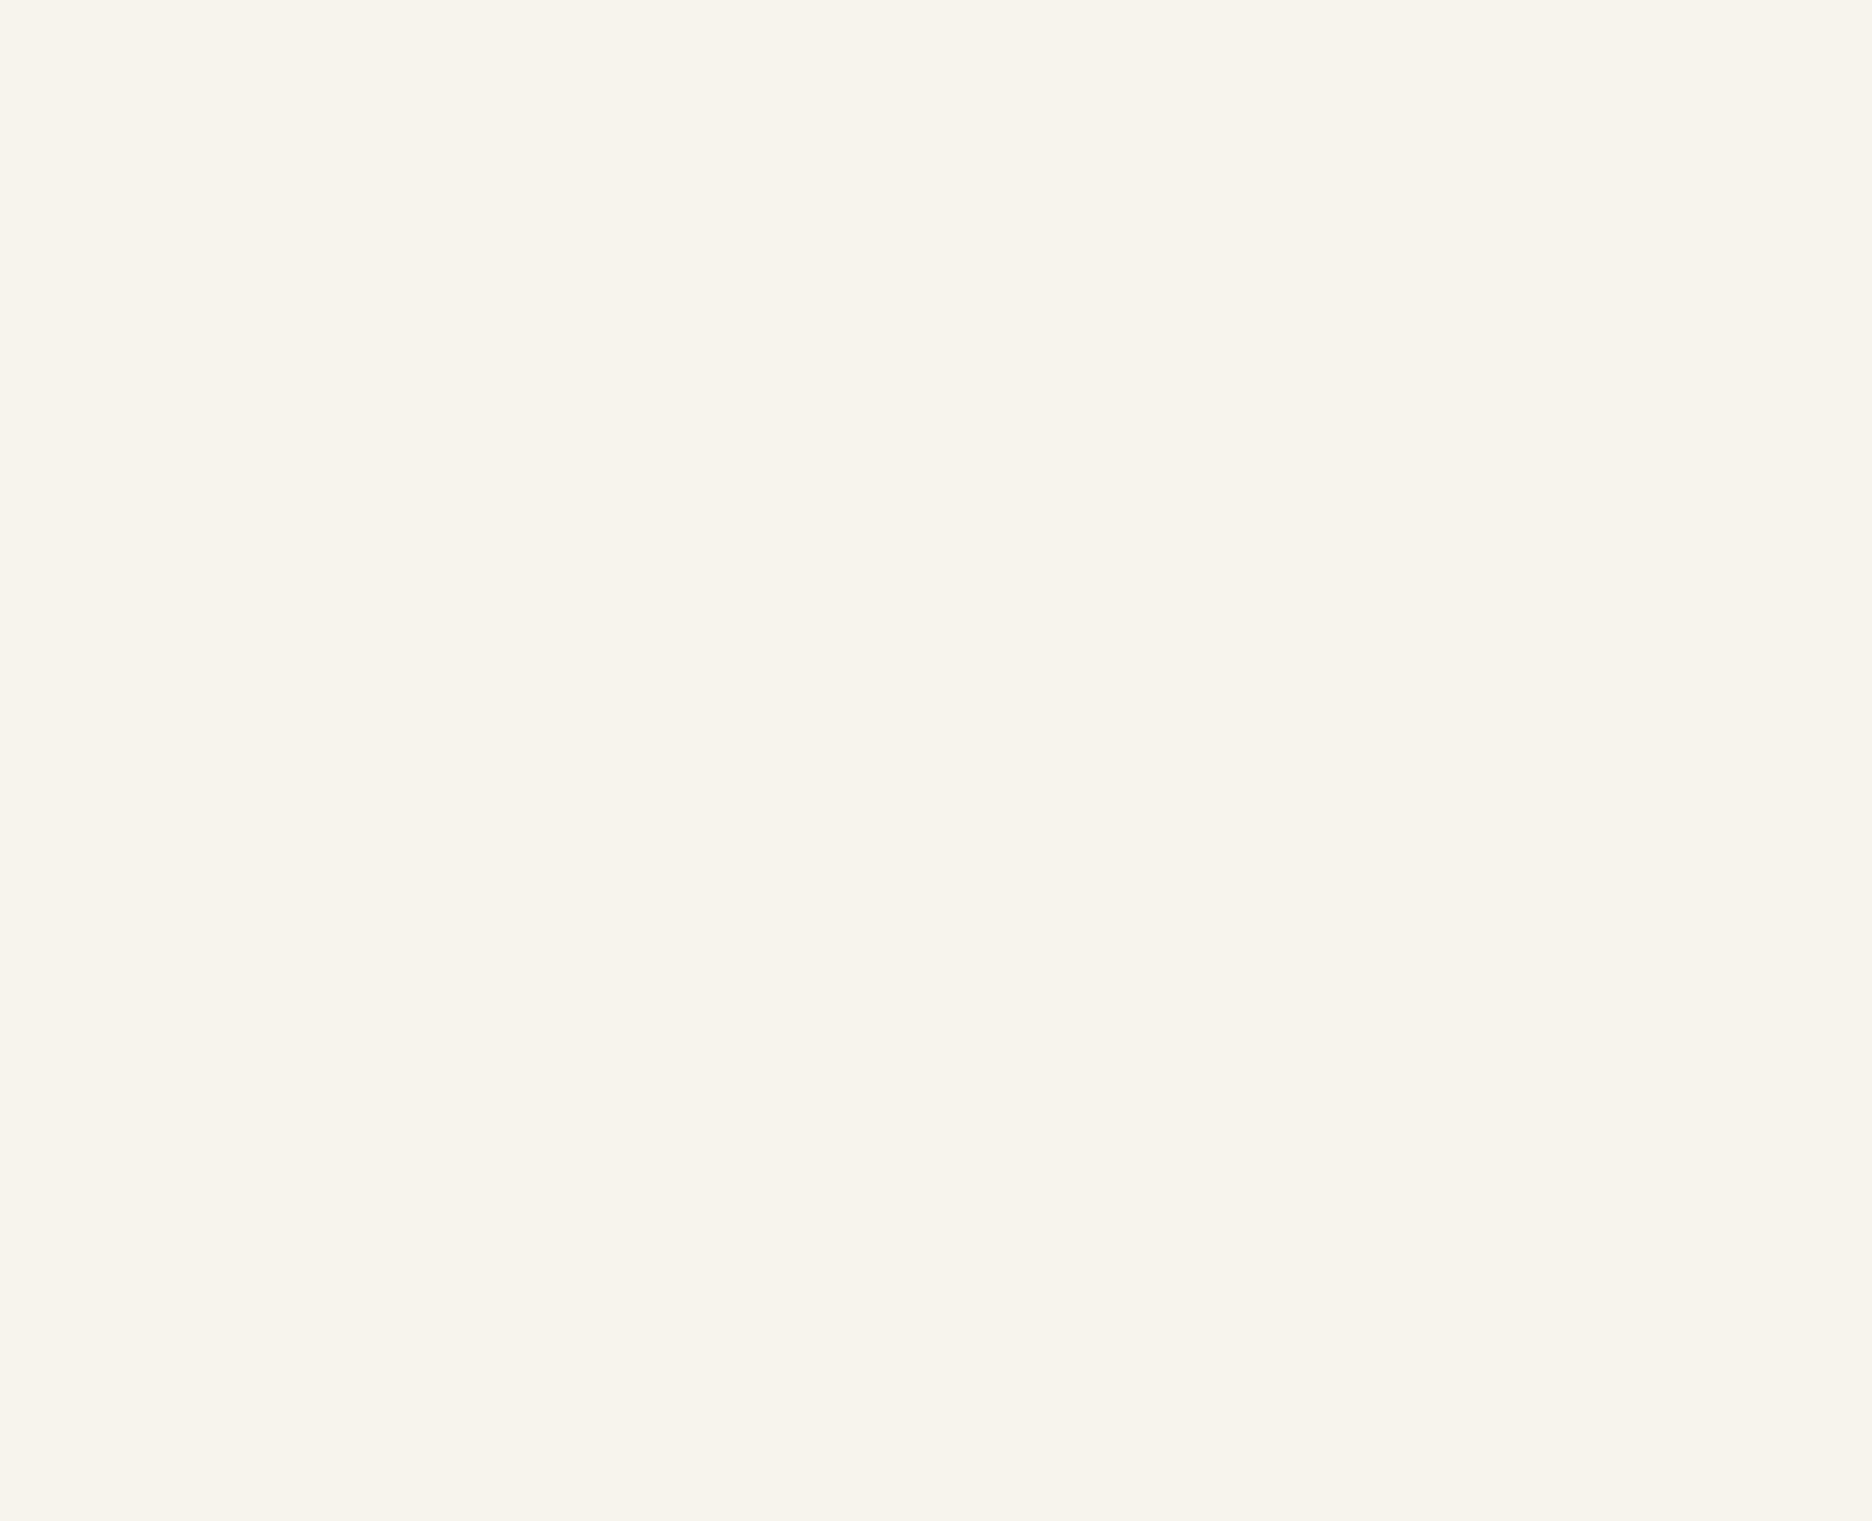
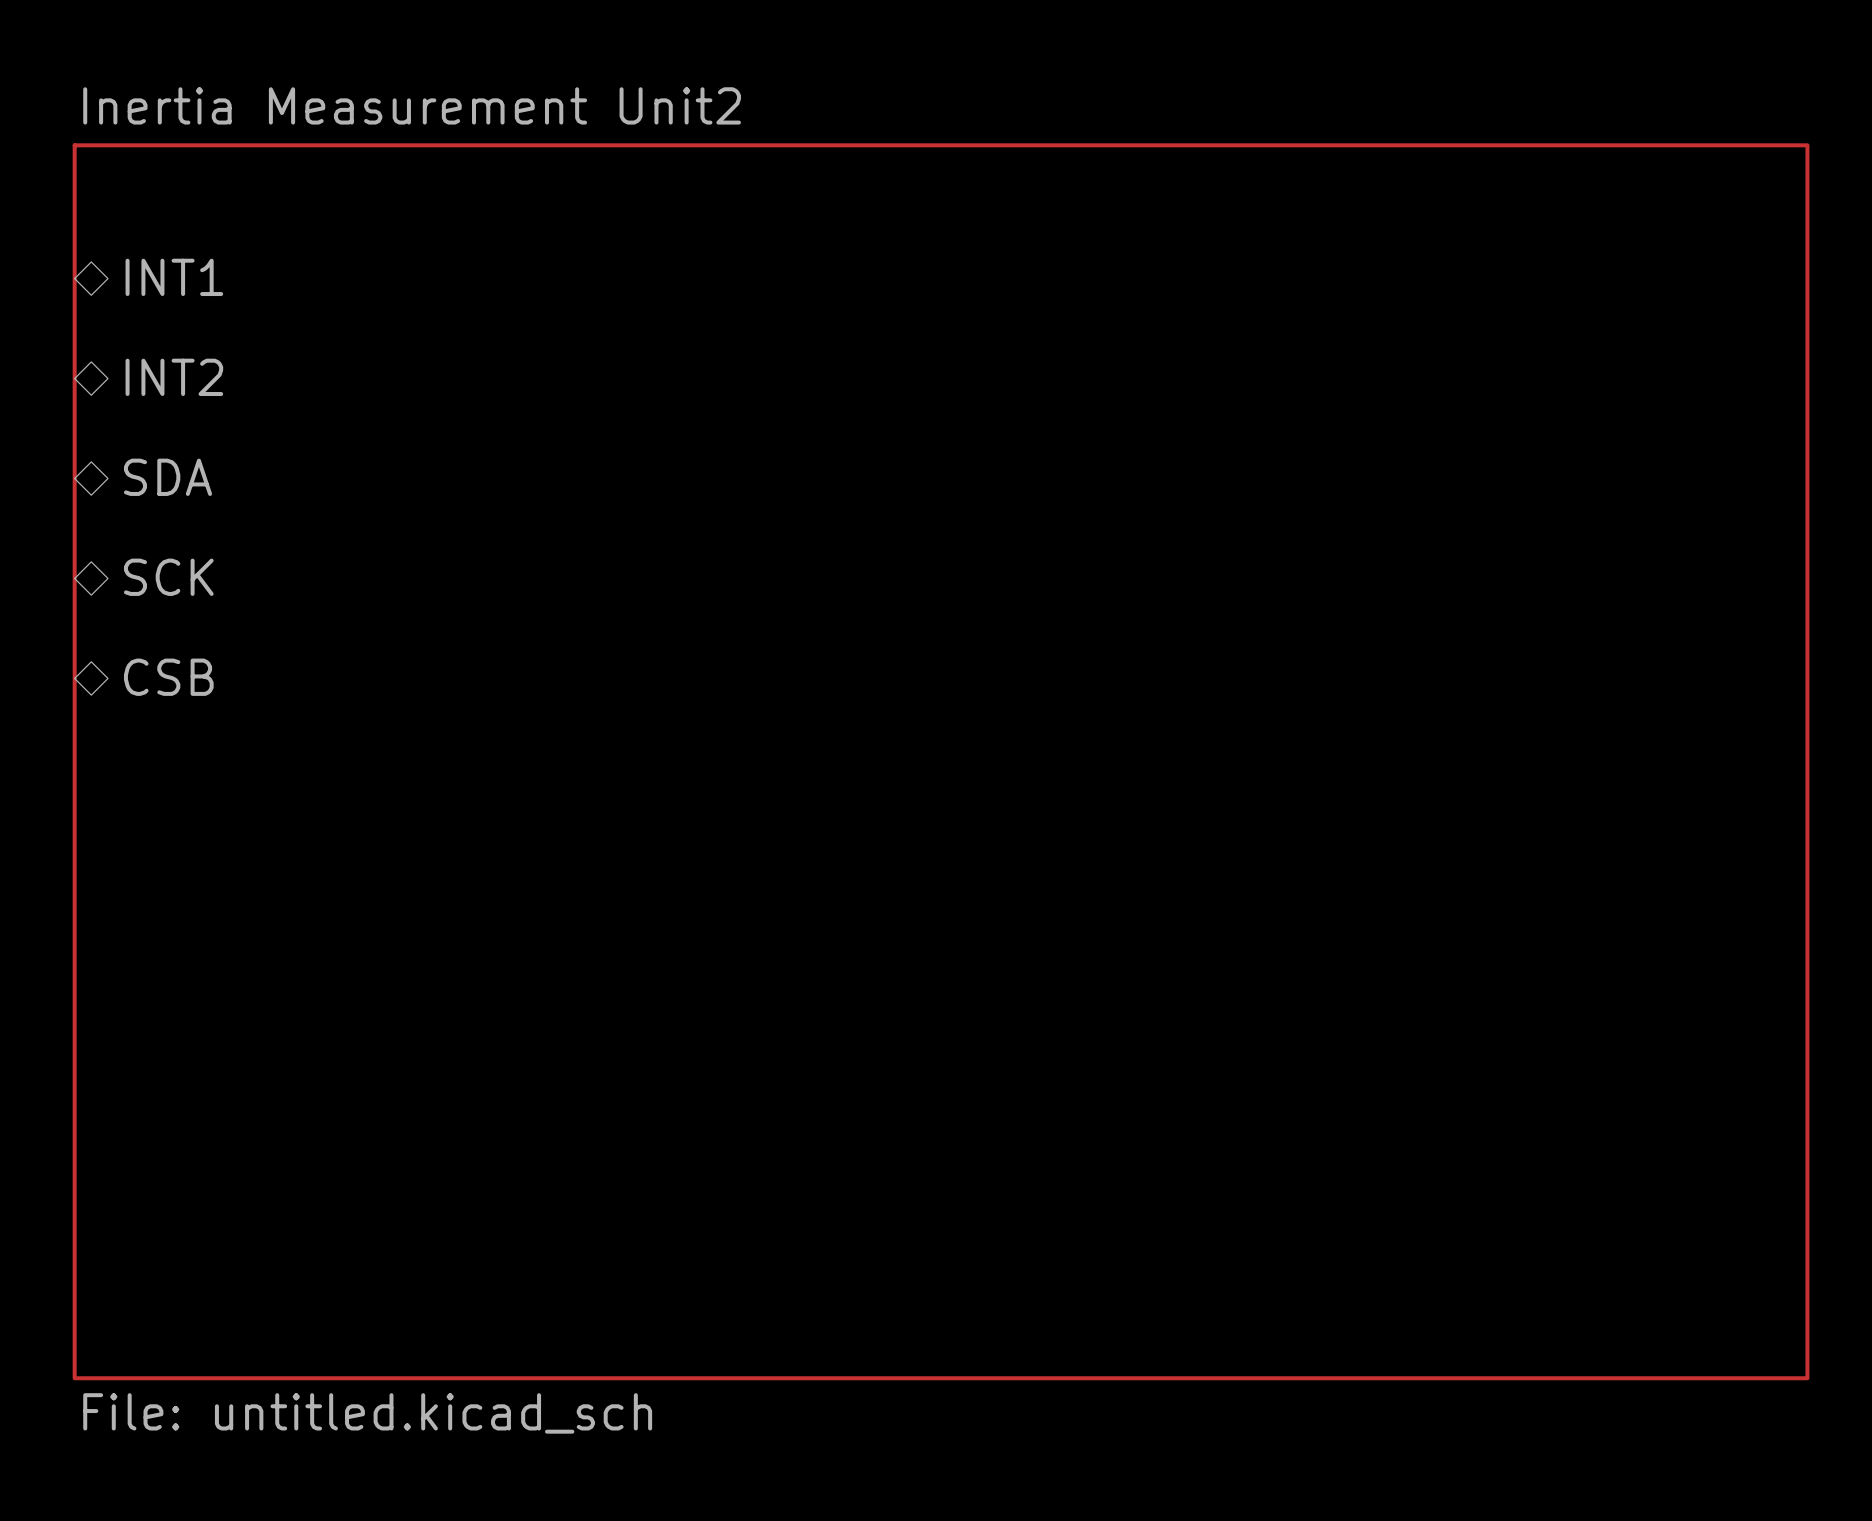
sheet pin: none -> INT1 (174, 277)
sheet pin: none -> INT2 (174, 377)
sheet pin: none -> SDA (168, 477)
sheet pin: none -> SCK (168, 577)
sheet pin: none -> CSB (168, 677)
sheet Inertia Measurement Unit2: none -> File: untitled.kicad_sch (941, 761)

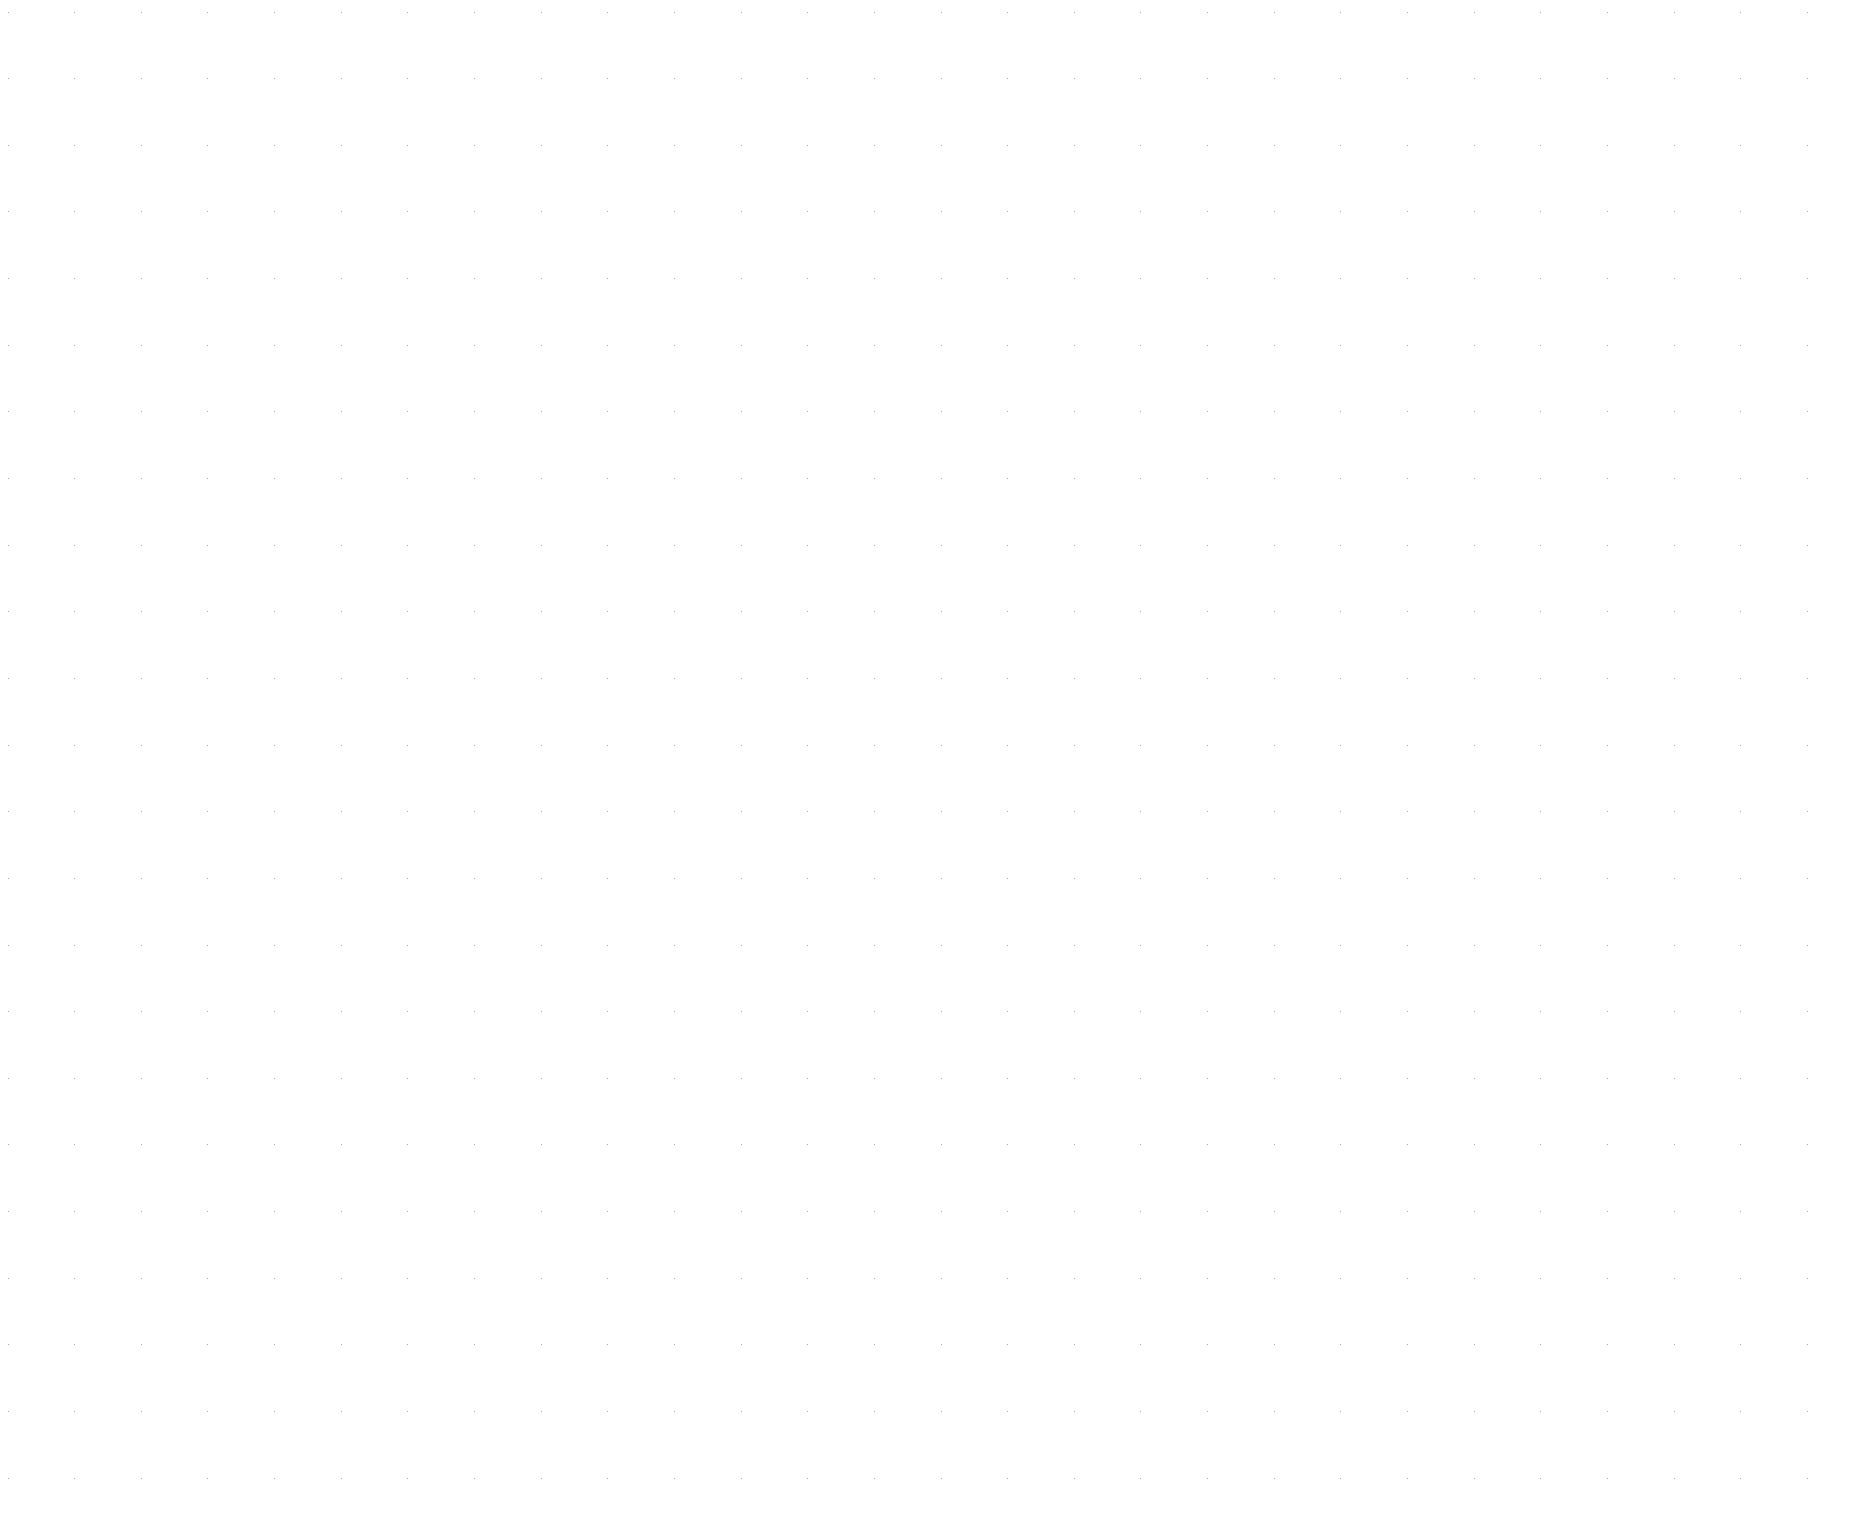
sheet pin: INT1 (174, 277) -> none
sheet pin: INT2 (174, 377) -> none
sheet pin: SDA (168, 477) -> none
sheet pin: SCK (168, 577) -> none
sheet pin: CSB (168, 677) -> none
sheet Inertia Measurement Unit2: File: untitled.kicad_sch (941, 761) -> none

